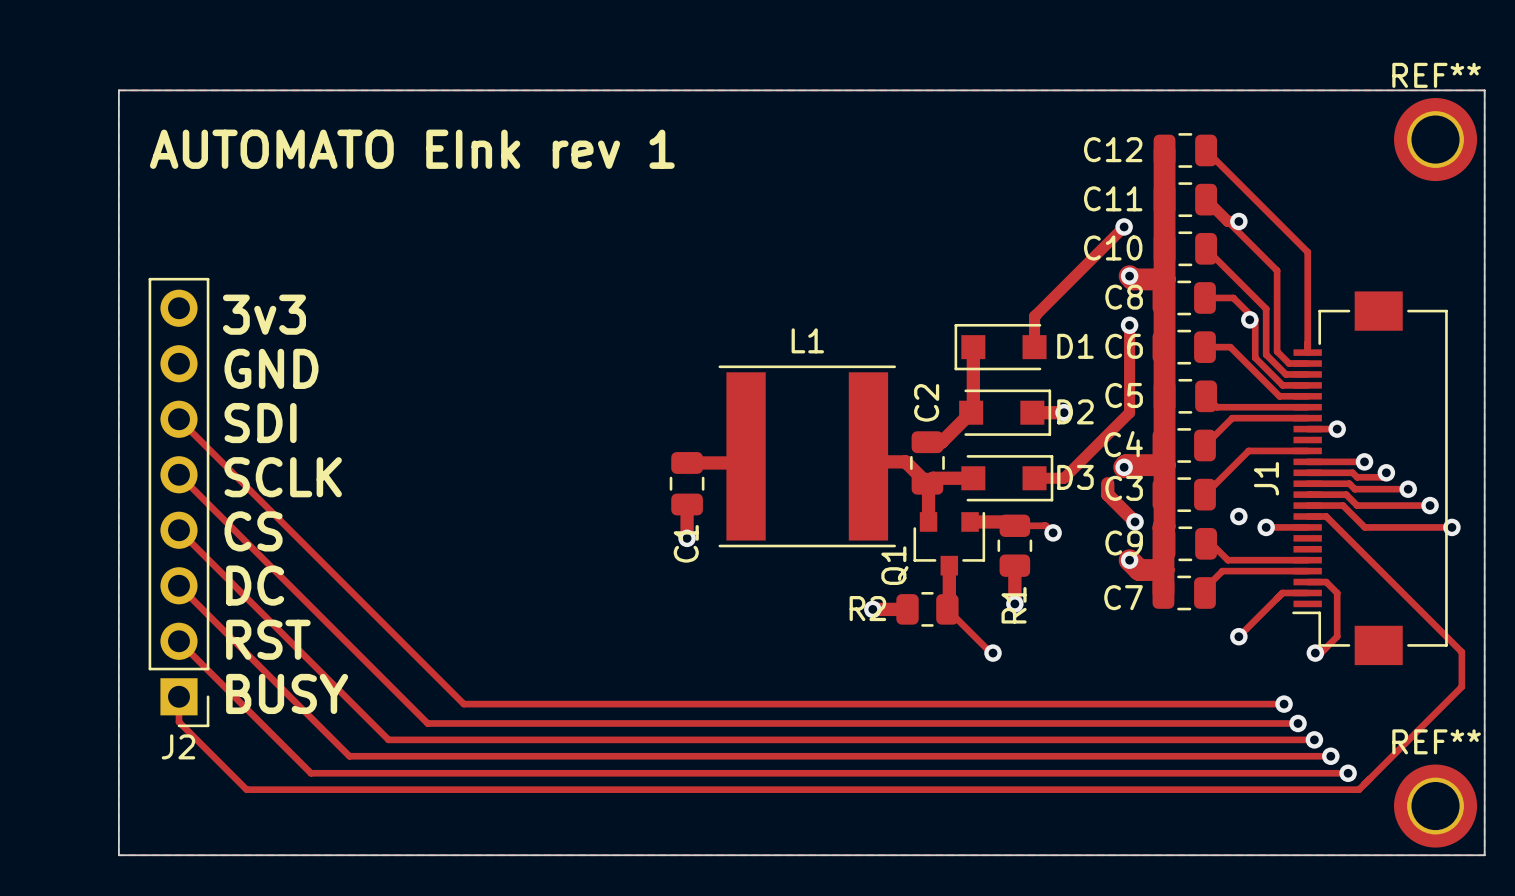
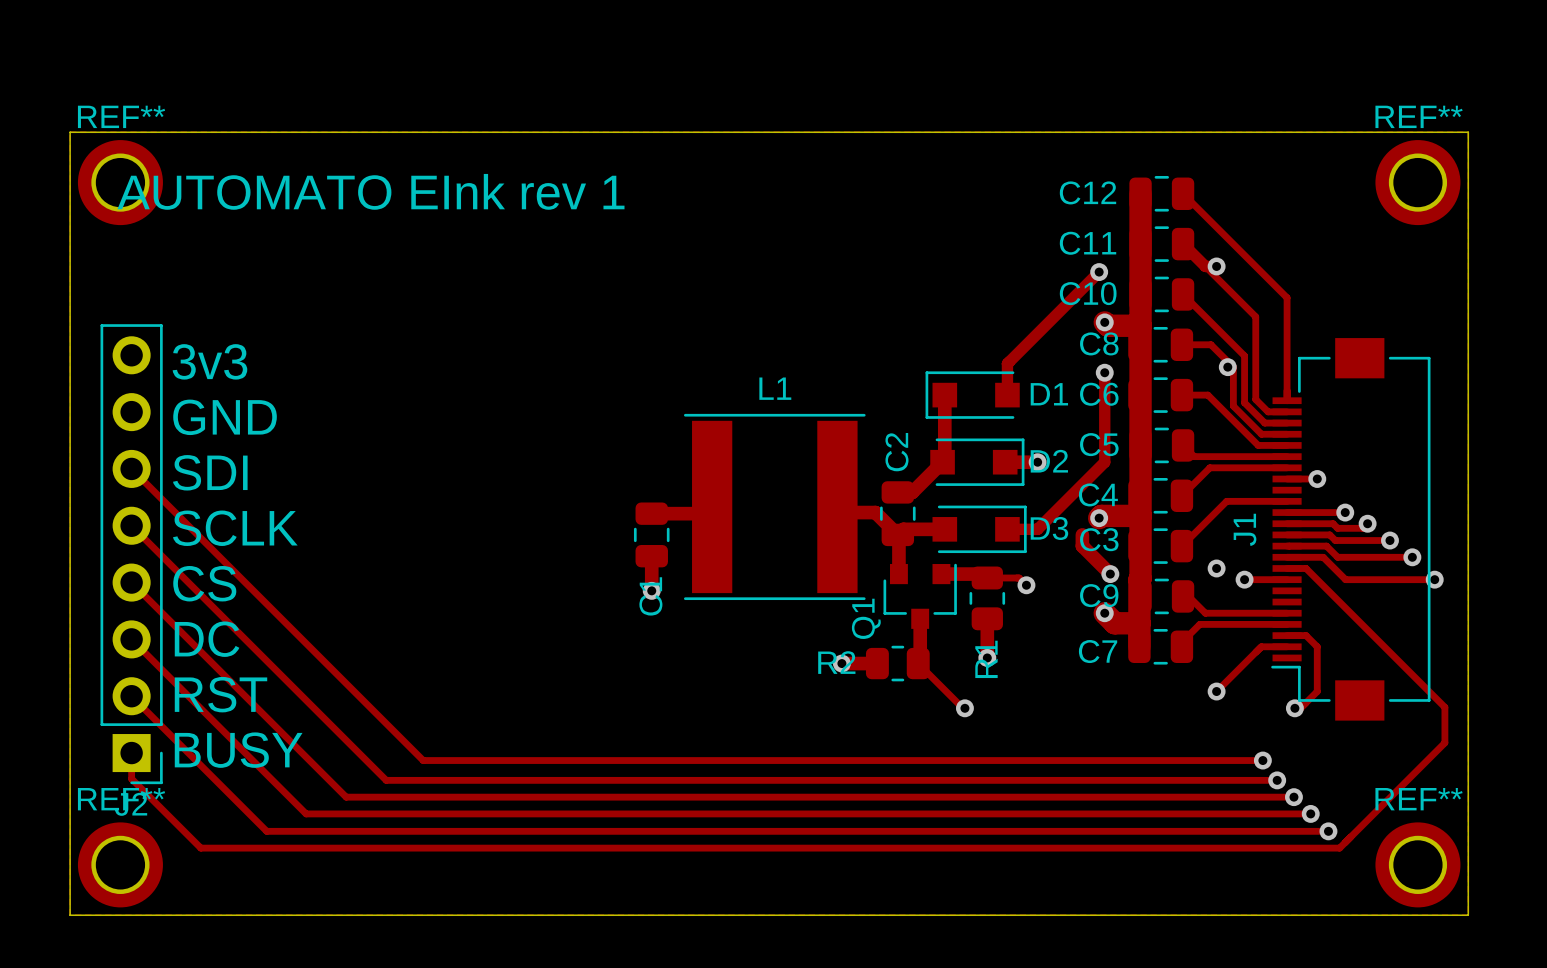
REF**: none -> (120, 182)
REF**: none -> (120, 864)

